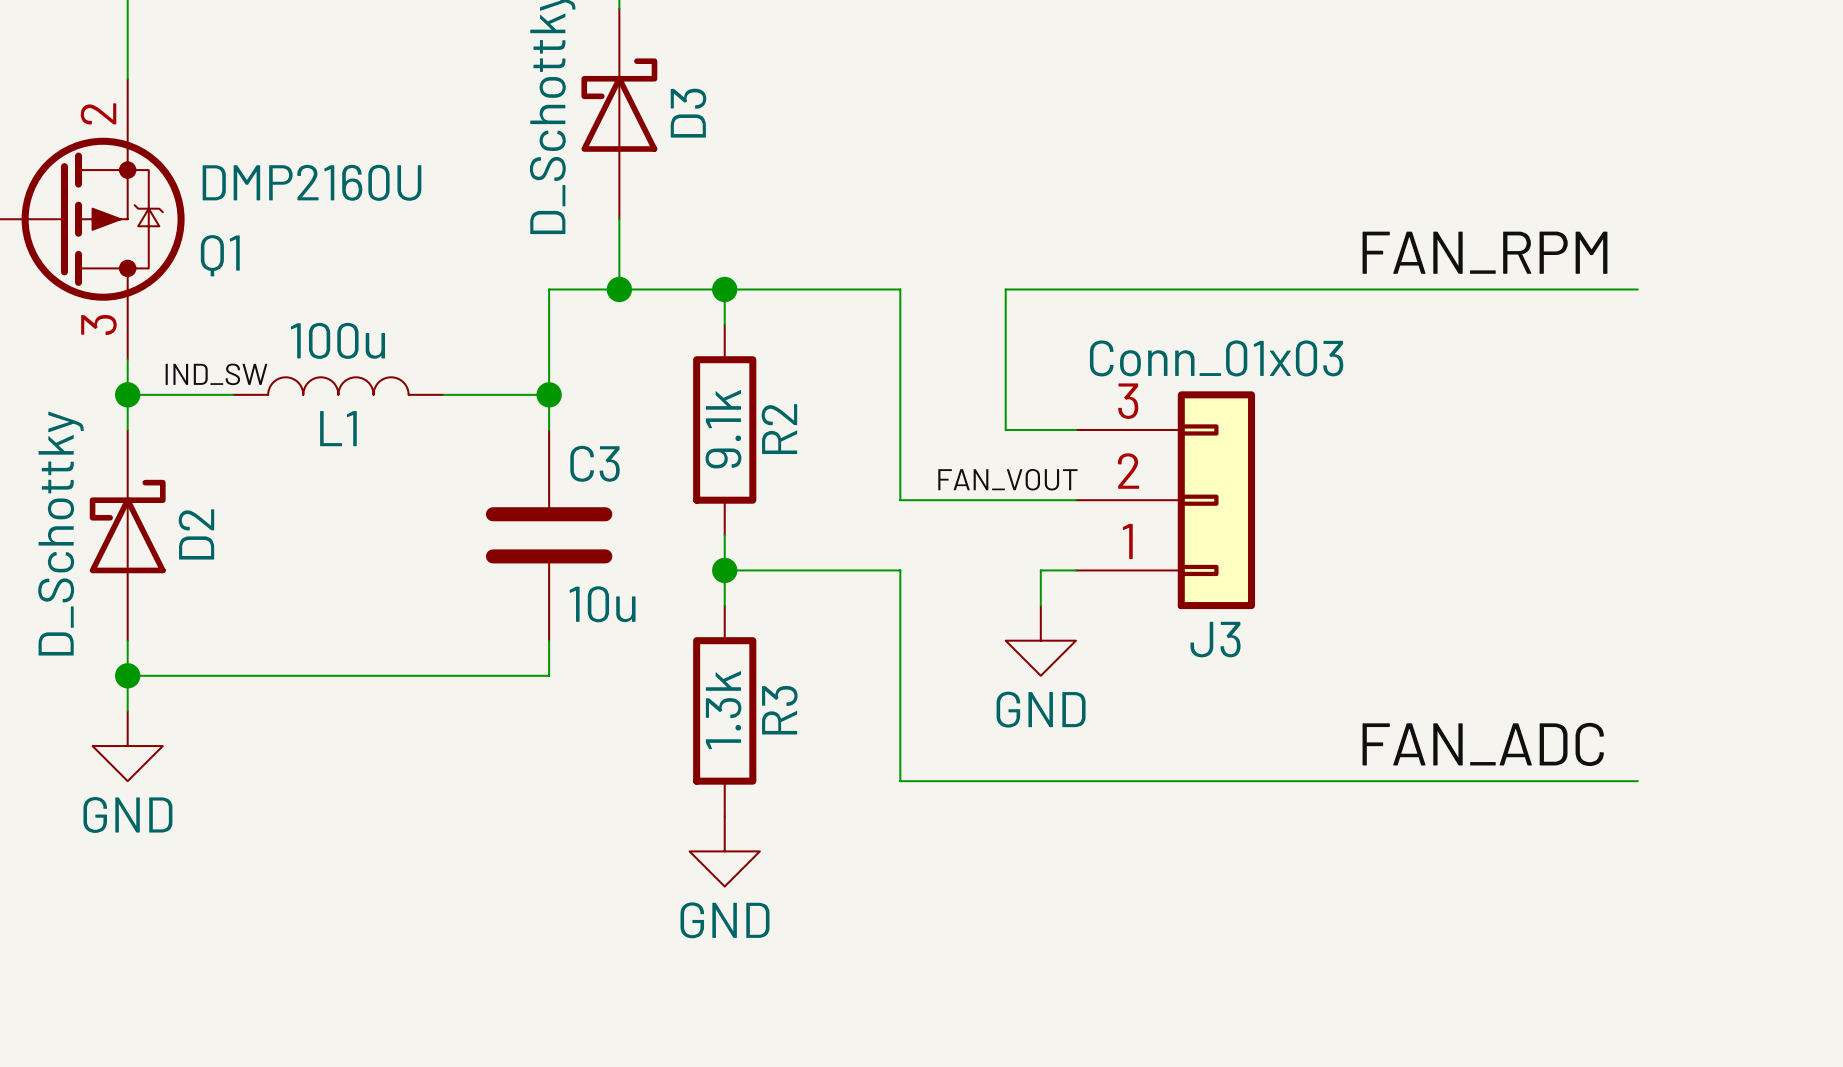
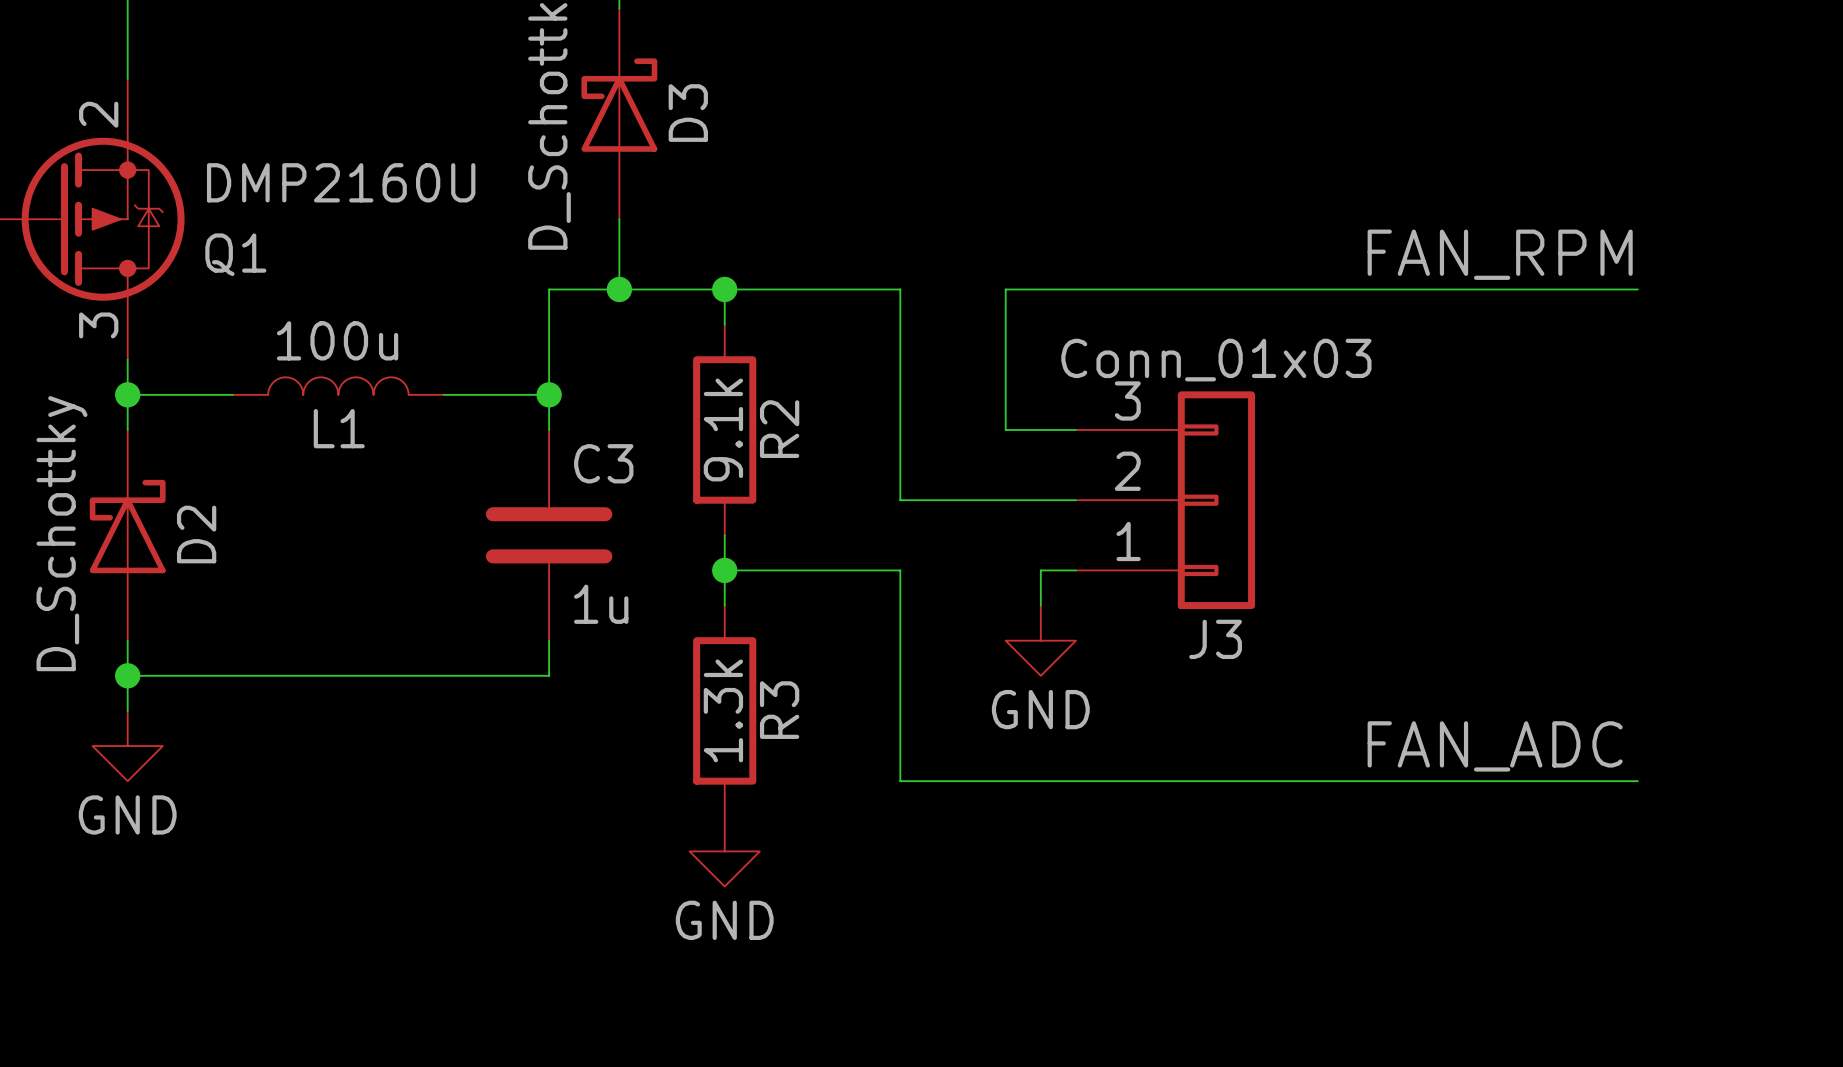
label: IND_SW (216, 374) -> none
label: FAN_VOUT (1007, 479) -> none
C3 value: 10u (602, 604) -> 1u (601, 604)

